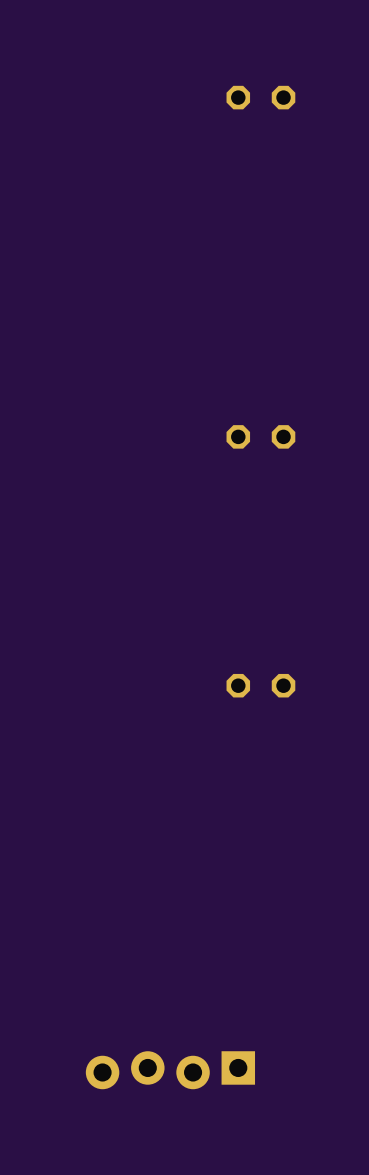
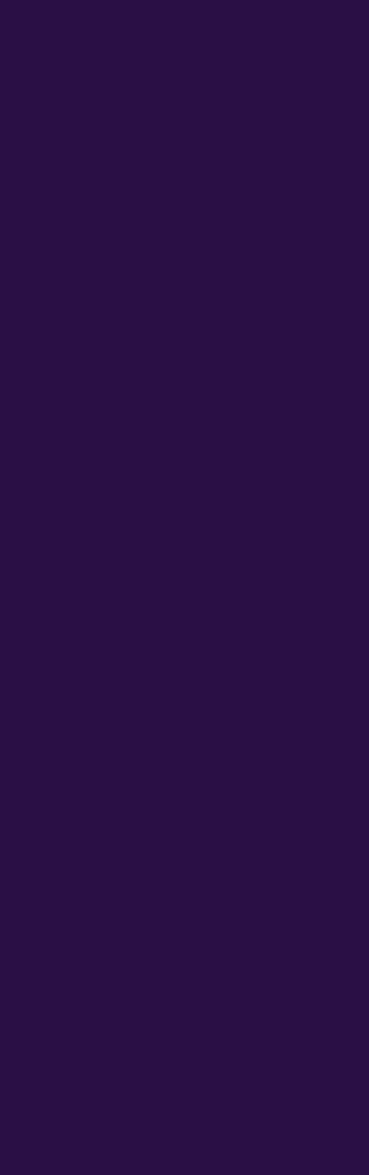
part: (260, 97) -> none
part: (260, 436) -> none
part: (260, 685) -> none
part: (170, 1070) -> none

